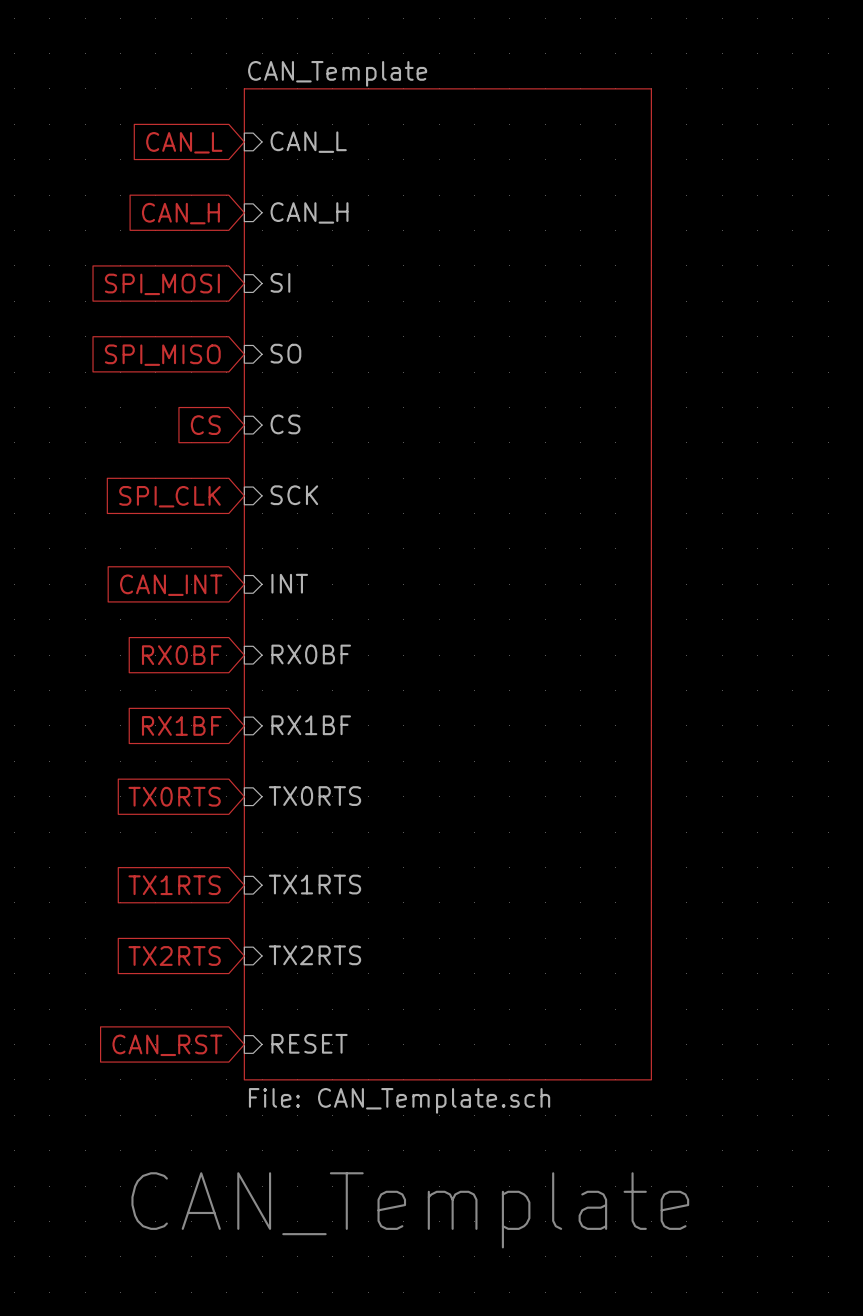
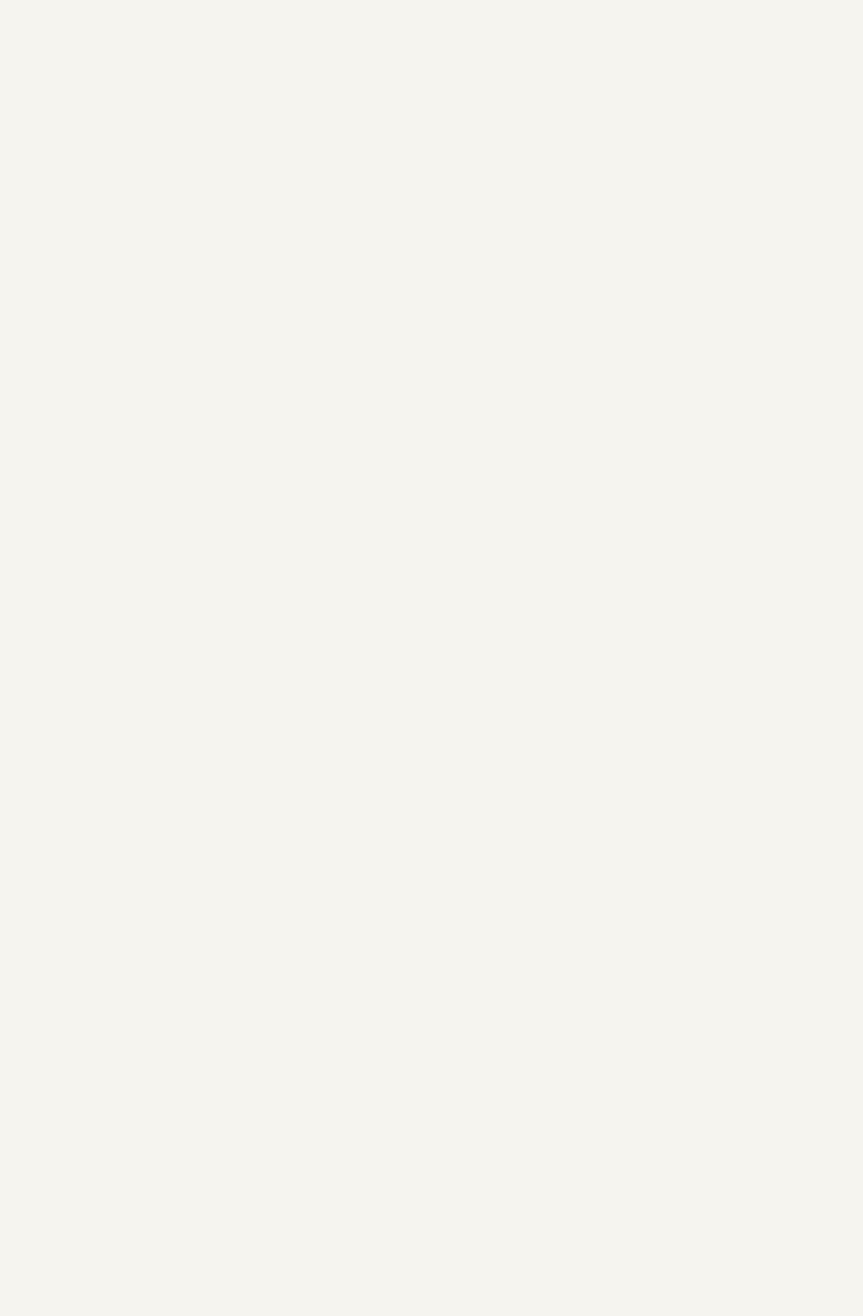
global label: CAN_L (184, 142) -> none
sheet pin: CAN_L (308, 142) -> none
sheet pin: CAN_H (309, 212) -> none
global label: CAN_H (180, 213) -> none
sheet pin: SI (280, 282) -> none
global label: SPI_MOSI (162, 284) -> none
sheet pin: SO (285, 353) -> none
global label: SPI_MISO (162, 355) -> none
sheet pin: CS (285, 424) -> none
global label: CS (205, 425) -> none
sheet pin: SCK (294, 495) -> none
global label: SPI_CLK (169, 496) -> none
sheet pin: INT (289, 583) -> none
sheet CAN_Template: File: CAN_Template.sch (447, 584) -> none
global label: CAN_INT (171, 585) -> none
sheet pin: RX0BF (311, 654) -> none
global label: RX0BF (181, 655) -> none
global label: RX1BF (181, 725) -> none
sheet pin: RX1BF (311, 725) -> none
global label: TX0RTS (174, 796) -> none
sheet pin: TX0RTS (315, 796) -> none
sheet pin: TX1RTS (315, 884) -> none
global label: TX1RTS (174, 885) -> none
global label: TX2RTS (174, 955) -> none
sheet pin: TX2RTS (315, 955) -> none
sheet pin: RESET (309, 1043) -> none
global label: CAN_RST (167, 1045) -> none
text: CAN_Template (410, 1210) -> none

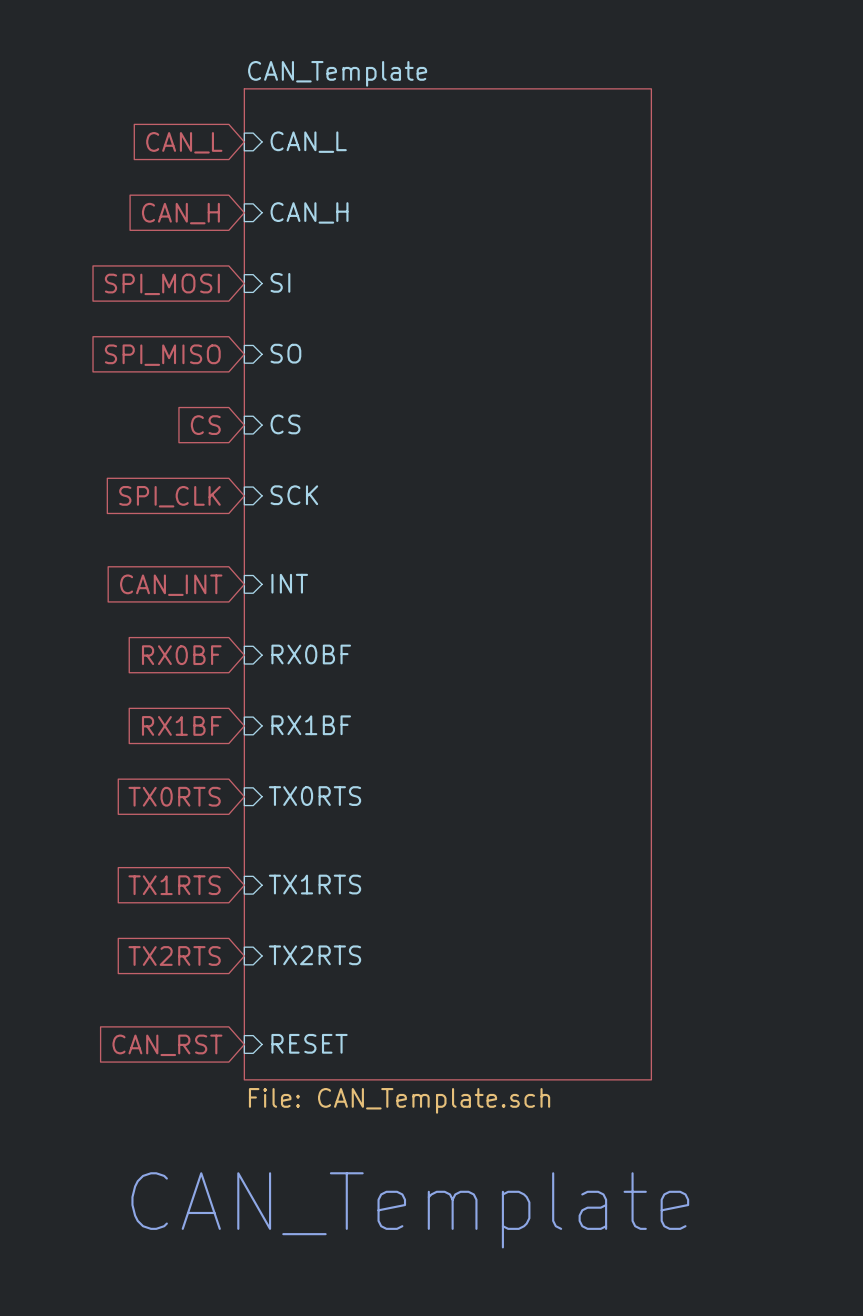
global label: none -> CAN_L (184, 142)
sheet pin: none -> CAN_L (308, 142)
sheet pin: none -> CAN_H (309, 212)
global label: none -> CAN_H (180, 213)
sheet pin: none -> SI (280, 282)
global label: none -> SPI_MOSI (162, 284)
sheet pin: none -> SO (285, 353)
global label: none -> SPI_MISO (162, 355)
sheet pin: none -> CS (285, 424)
global label: none -> CS (205, 425)
sheet pin: none -> SCK (294, 495)
global label: none -> SPI_CLK (169, 496)
sheet pin: none -> INT (289, 583)
sheet CAN_Template: none -> File: CAN_Template.sch (447, 584)
global label: none -> CAN_INT (171, 585)
sheet pin: none -> RX0BF (311, 654)
global label: none -> RX0BF (181, 655)
global label: none -> RX1BF (181, 725)
sheet pin: none -> RX1BF (311, 725)
global label: none -> TX0RTS (174, 796)
sheet pin: none -> TX0RTS (315, 796)
sheet pin: none -> TX1RTS (315, 884)
global label: none -> TX1RTS (174, 885)
sheet pin: none -> TX2RTS (315, 955)
global label: none -> TX2RTS (174, 955)
sheet pin: none -> RESET (309, 1043)
global label: none -> CAN_RST (167, 1045)
text: none -> CAN_Template (410, 1210)

